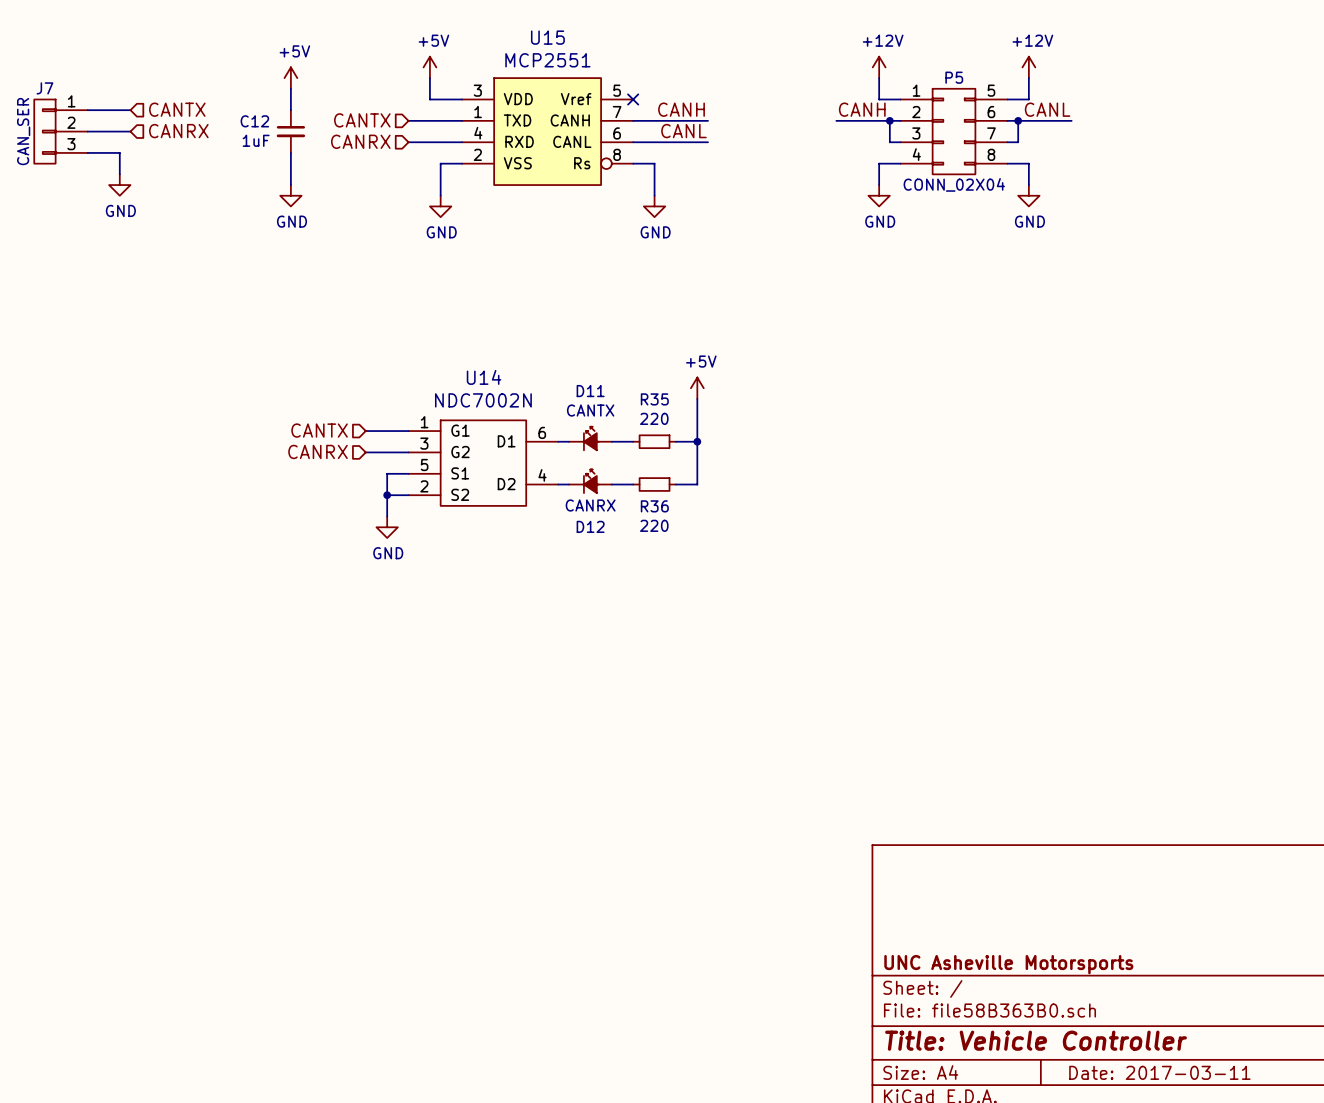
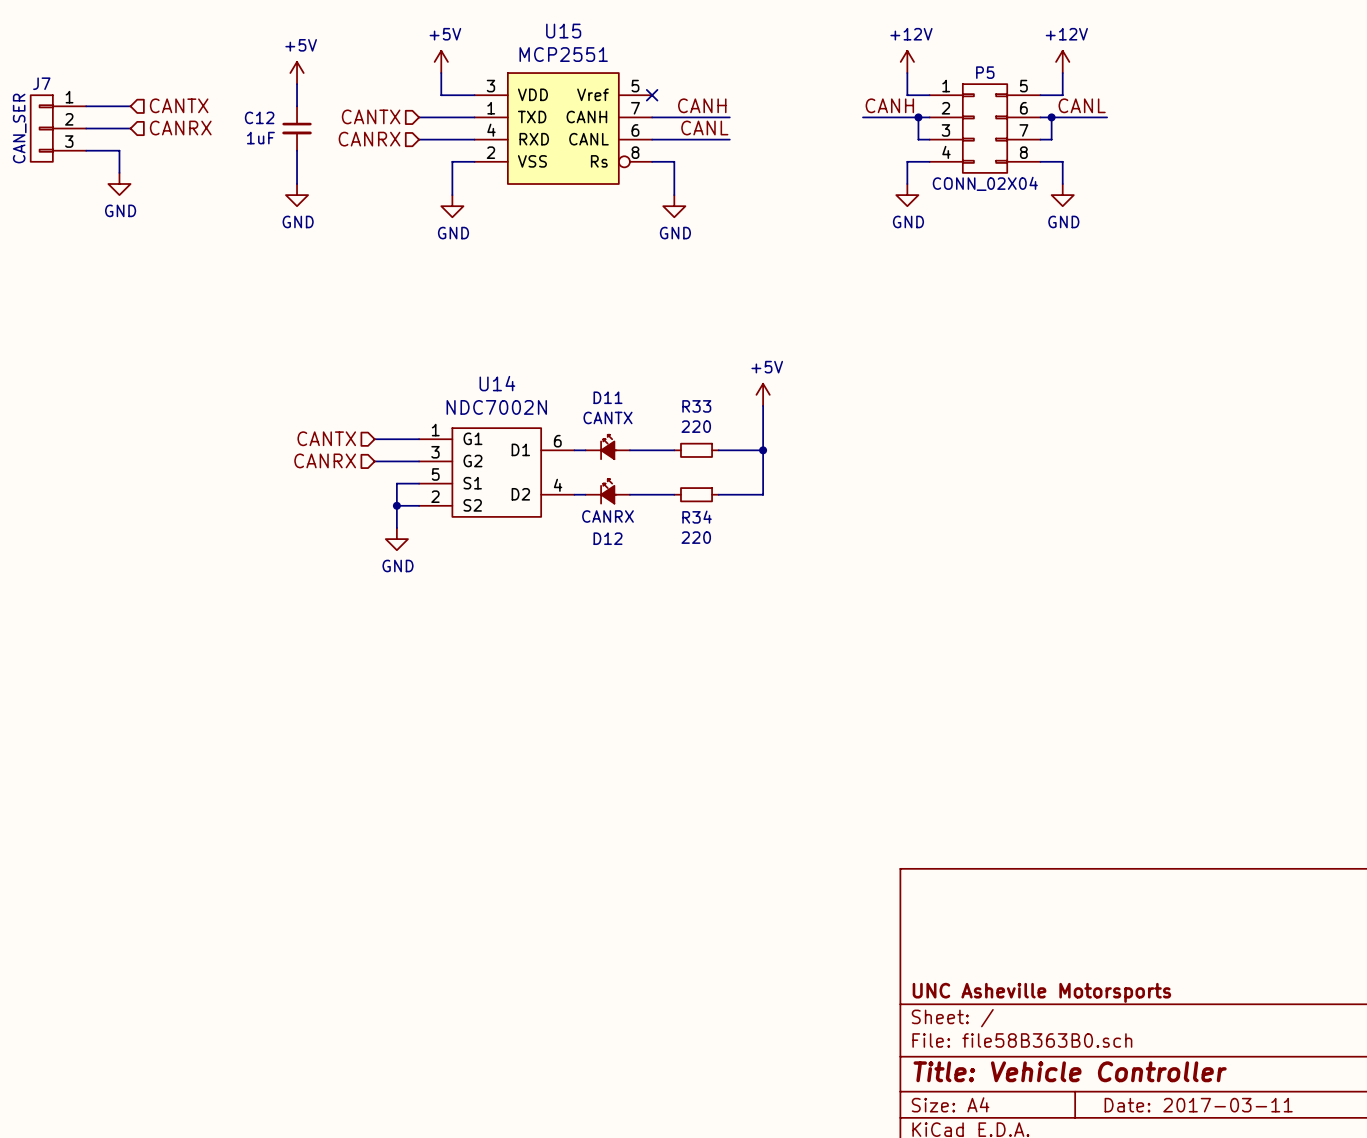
power symbol position: +5V (697, 388) -> +5V (763, 394)
wire: (697, 398) (697, 484) (675, 484) -> none
wire: none -> (763, 405) (763, 494) (718, 494)
wire: none -> (652, 450) (674, 450)
R35: 220 (654, 441) -> none
wire: (675, 441) (697, 441) -> (763, 450) (718, 450)
R33: none -> 220 (696, 450)
junction position: (697, 441) -> (763, 450)
wire: none -> (652, 494) (674, 494)
R36: 220 (654, 484) -> none
R34: none -> 220 (696, 494)

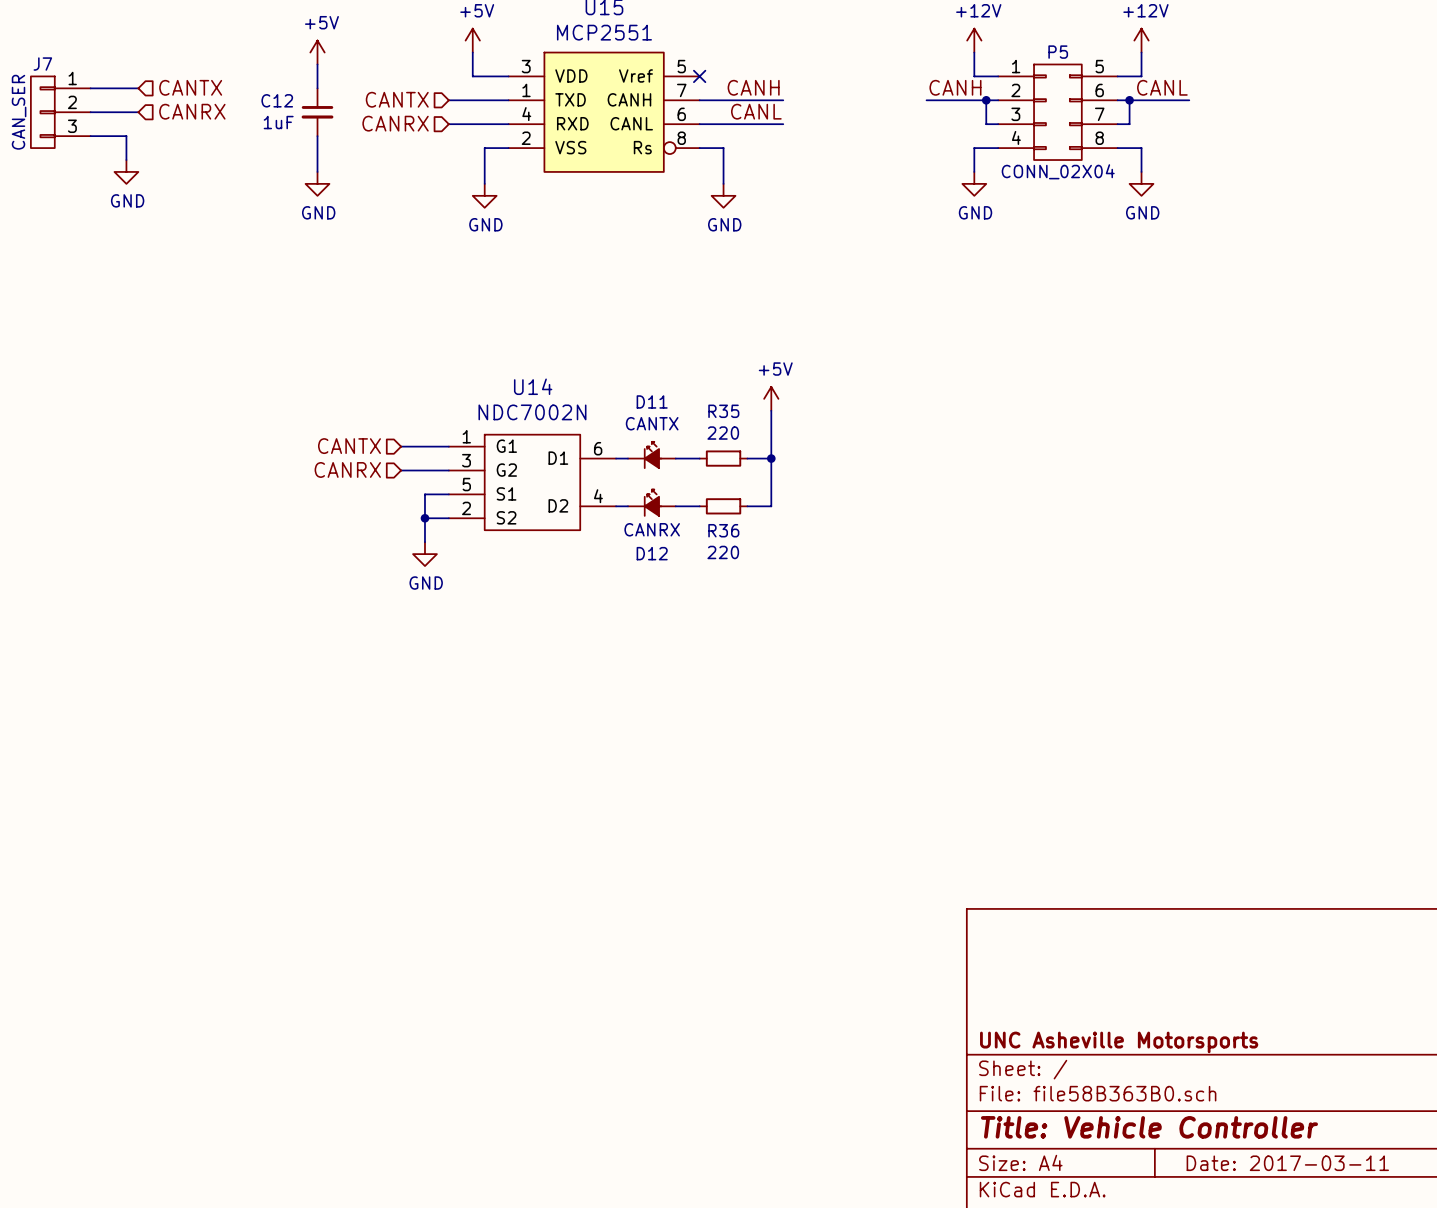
power symbol position: +5V (763, 394) -> +5V (771, 398)
wire: none -> (771, 410) (771, 506) (747, 506)
wire: (763, 405) (763, 494) (718, 494) -> none
wire: (652, 450) (674, 450) -> none
R35: none -> 220 (723, 458)
R33: 220 (696, 450) -> none
wire: (718, 450) (763, 450) -> (771, 458) (747, 458)
junction position: (763, 450) -> (771, 458)
wire: (652, 494) (674, 494) -> none
R36: none -> 220 (723, 506)
R34: 220 (696, 494) -> none

